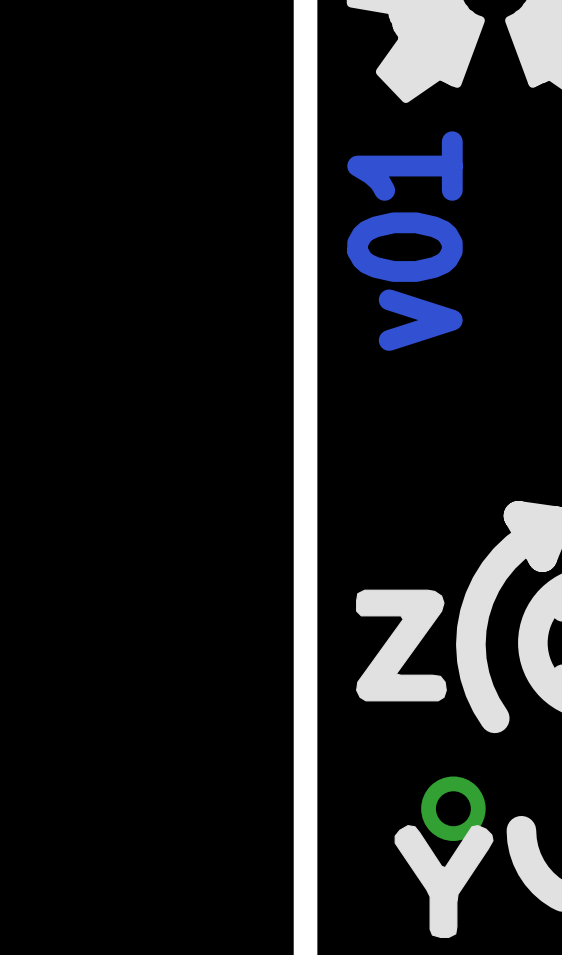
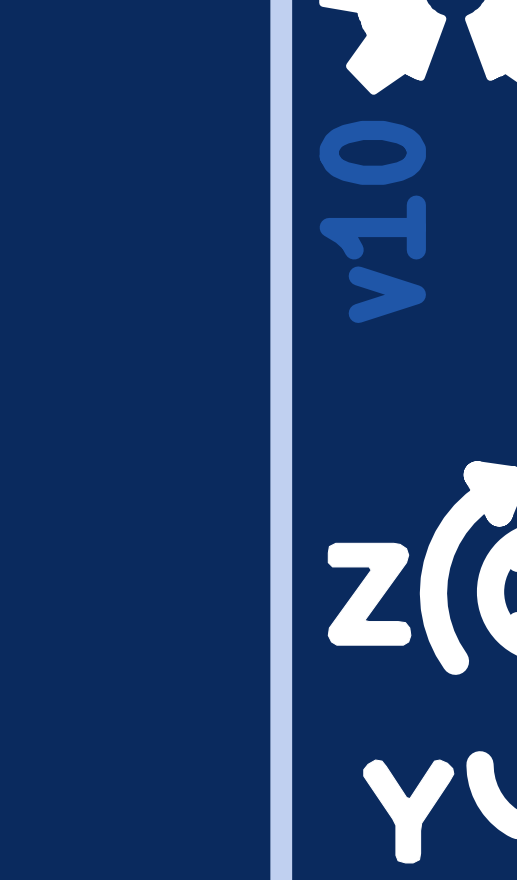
text: v01 (404, 241) -> v10 (372, 221)
via: (453, 808) -> none

